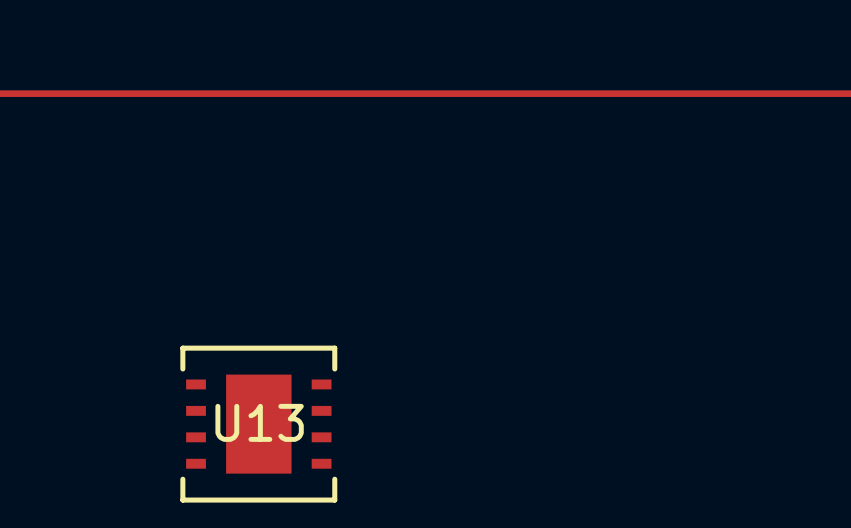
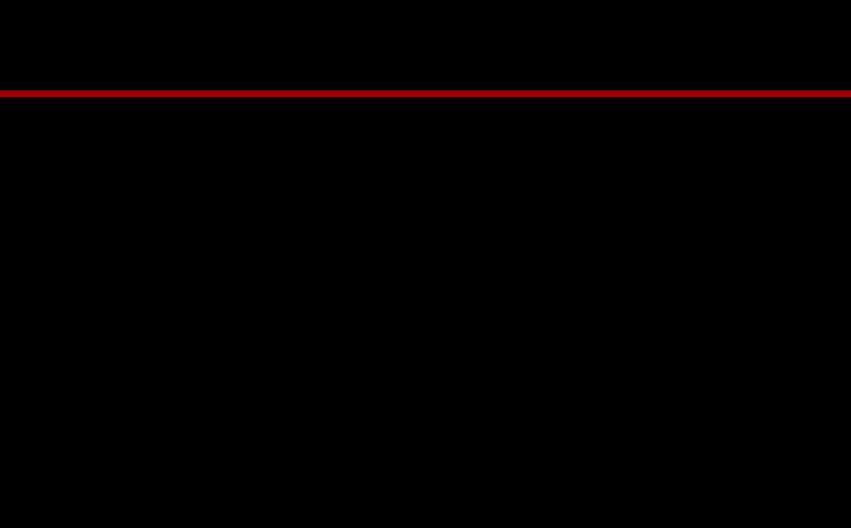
U13: (258, 424) -> none

